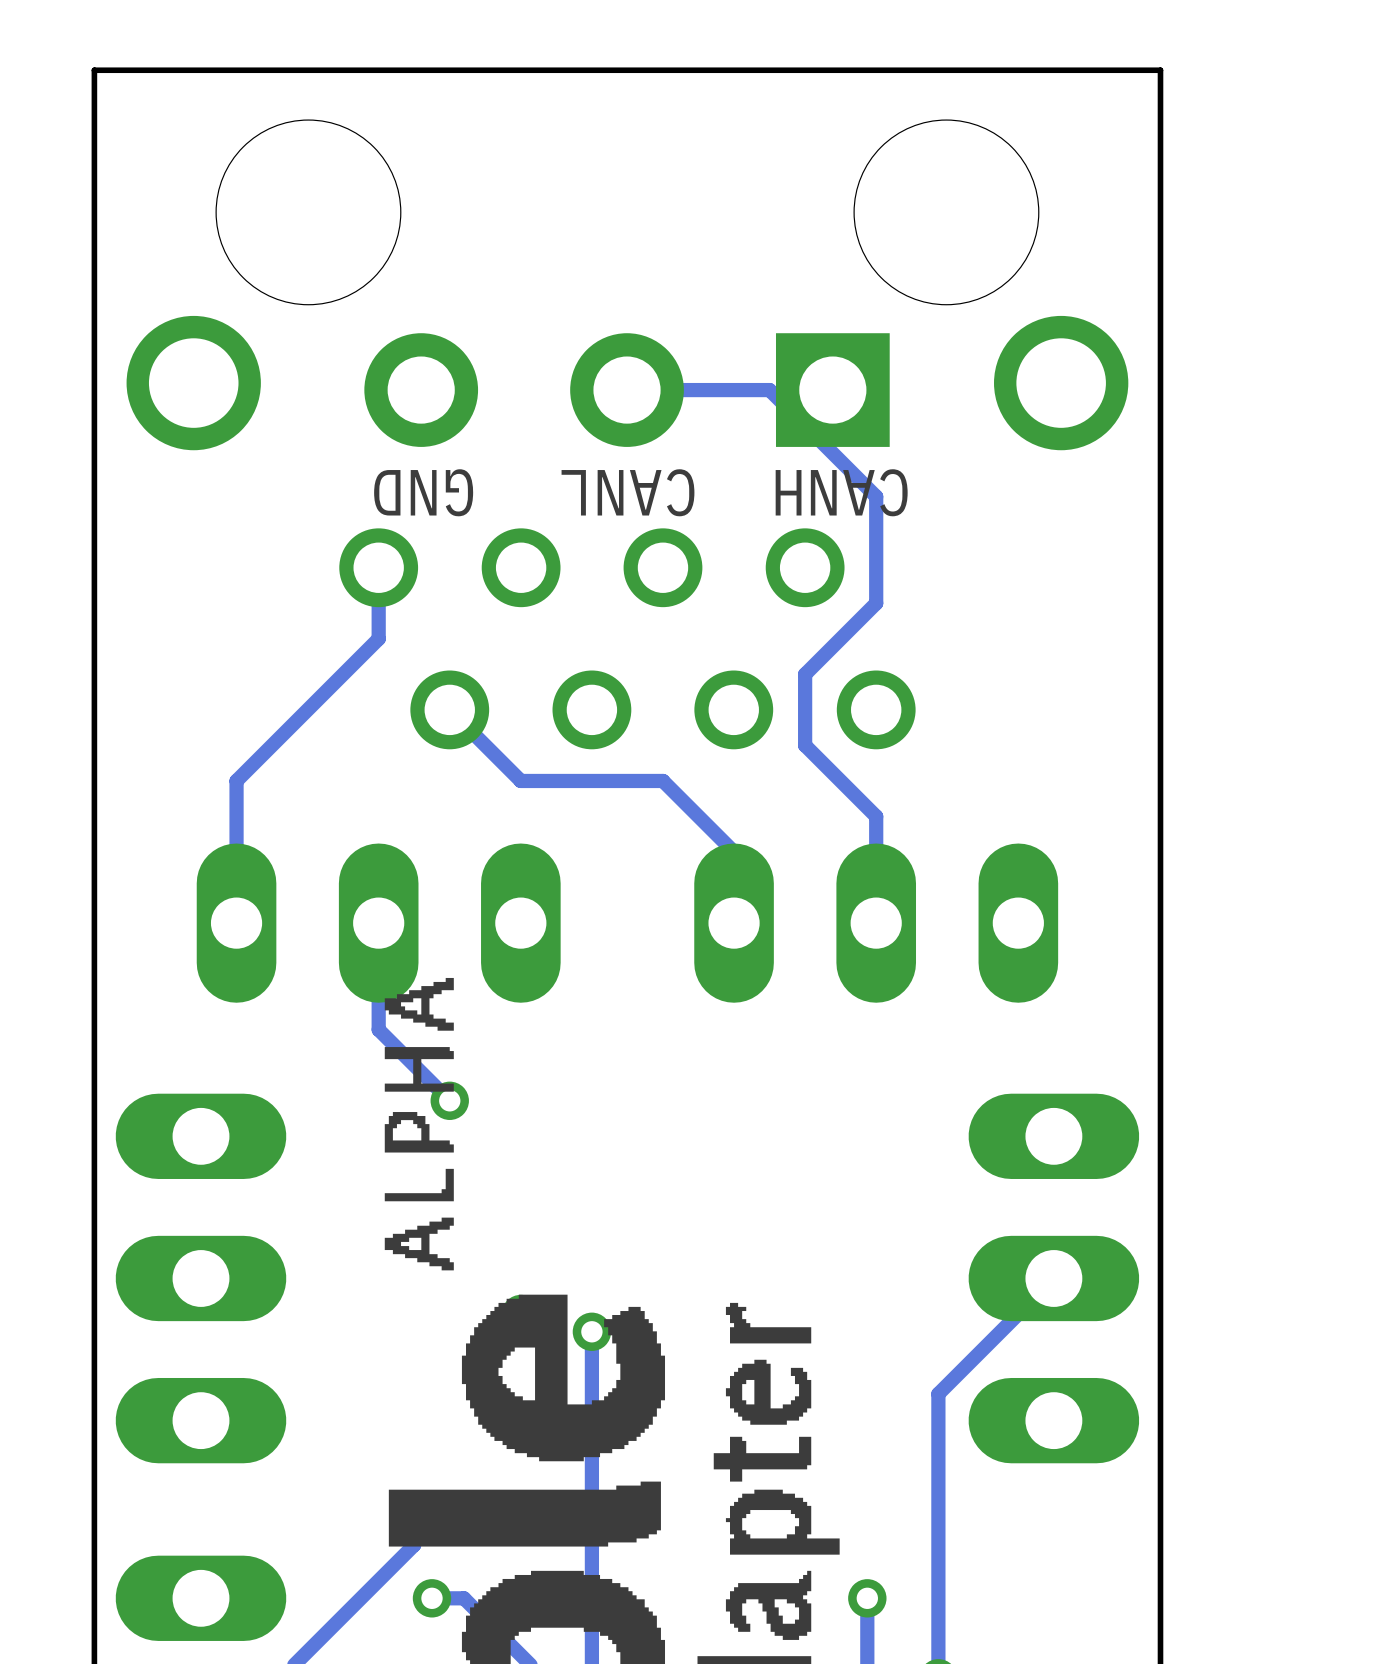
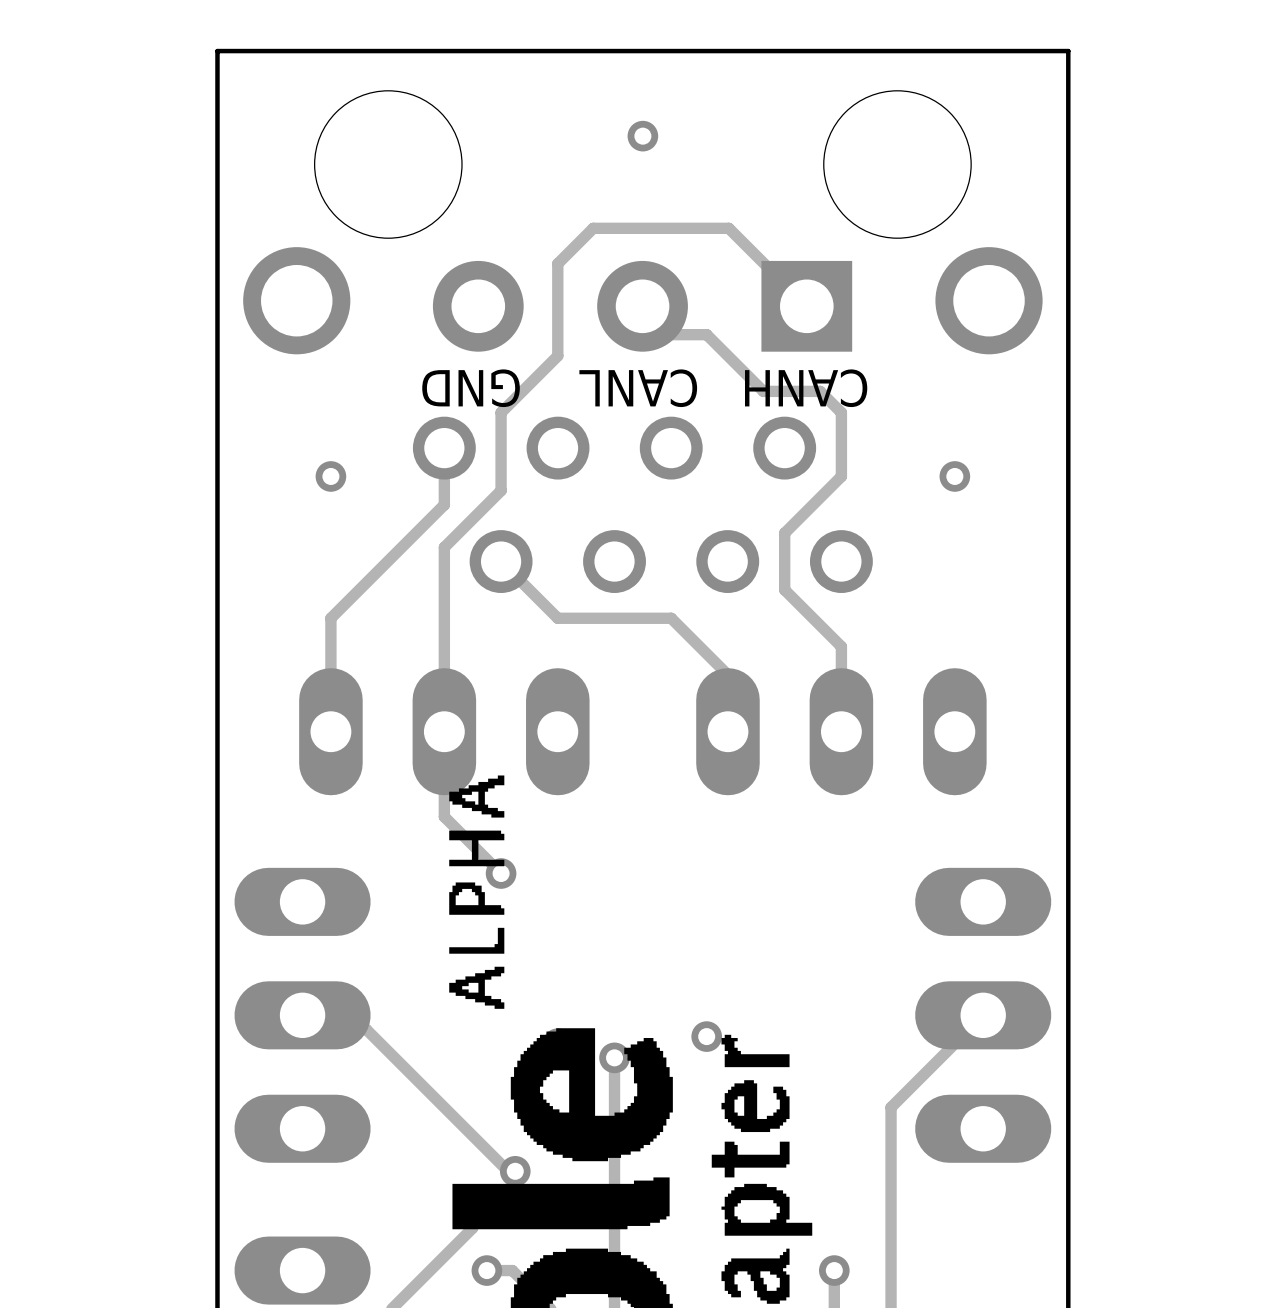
via: none -> (642, 136)
track: (627, 390) (769, 390) (876, 496) (876, 523) -> (642, 306) (670, 334) (706, 334) (763, 391) (820, 391) (841, 412)
track: none -> (806, 306) (728, 228) (593, 228) (557, 263) (557, 355) (501, 412) (501, 490) (444, 547) (444, 731)
via: none -> (330, 476)
via: none -> (954, 476)
track: none -> (302, 1015) (316, 1029) (366, 1029) (508, 1171) (515, 1171)
via: none -> (706, 1036)
via: none -> (515, 1171)

